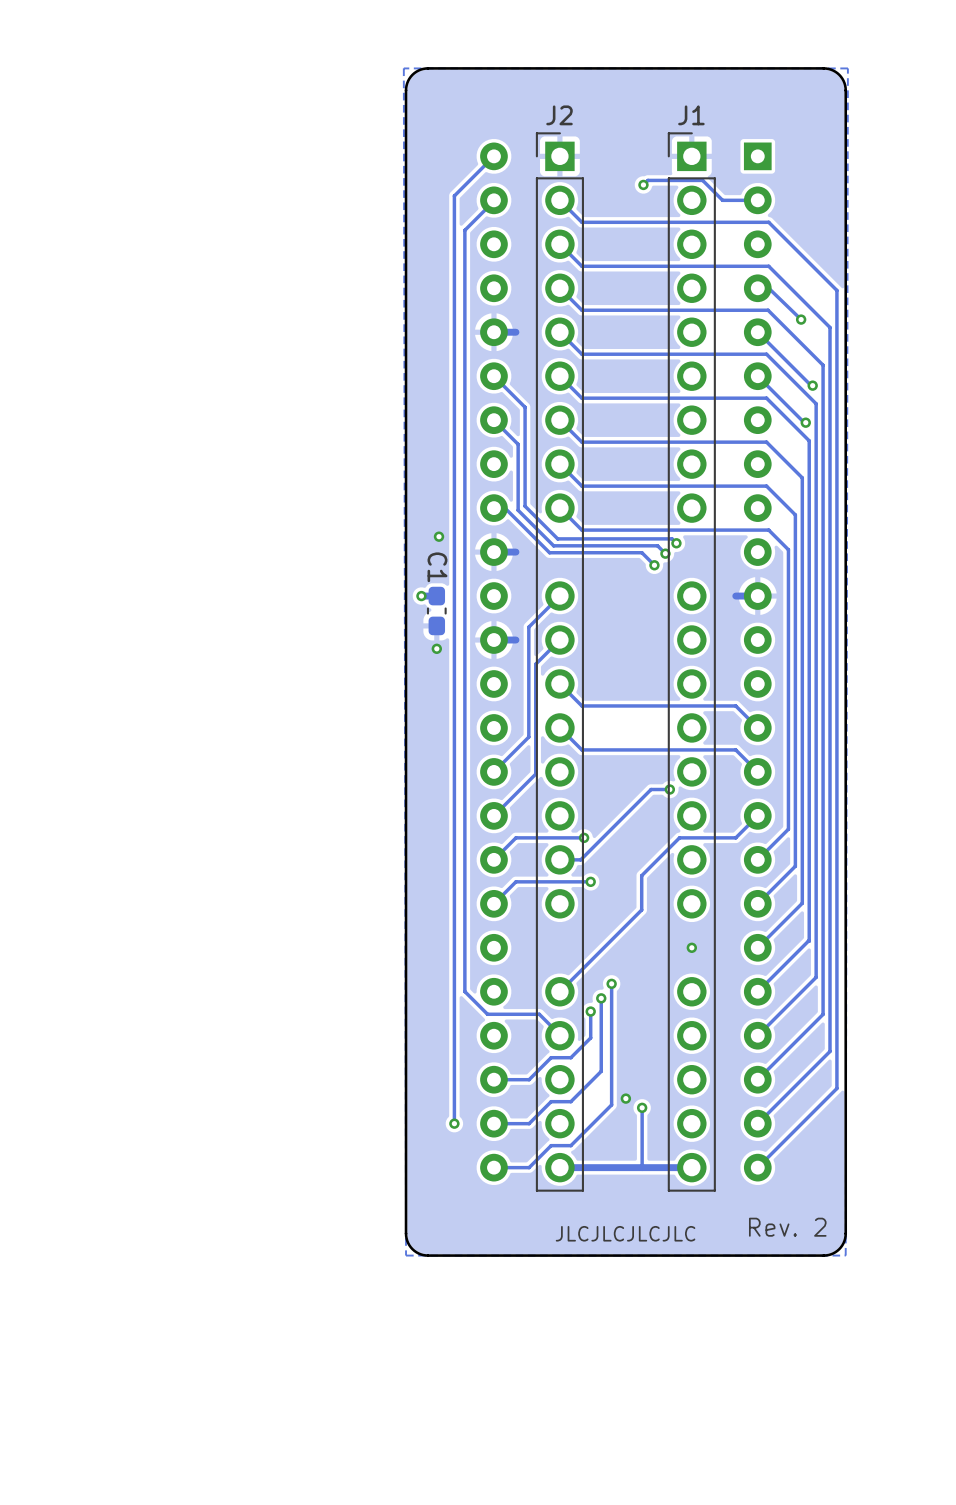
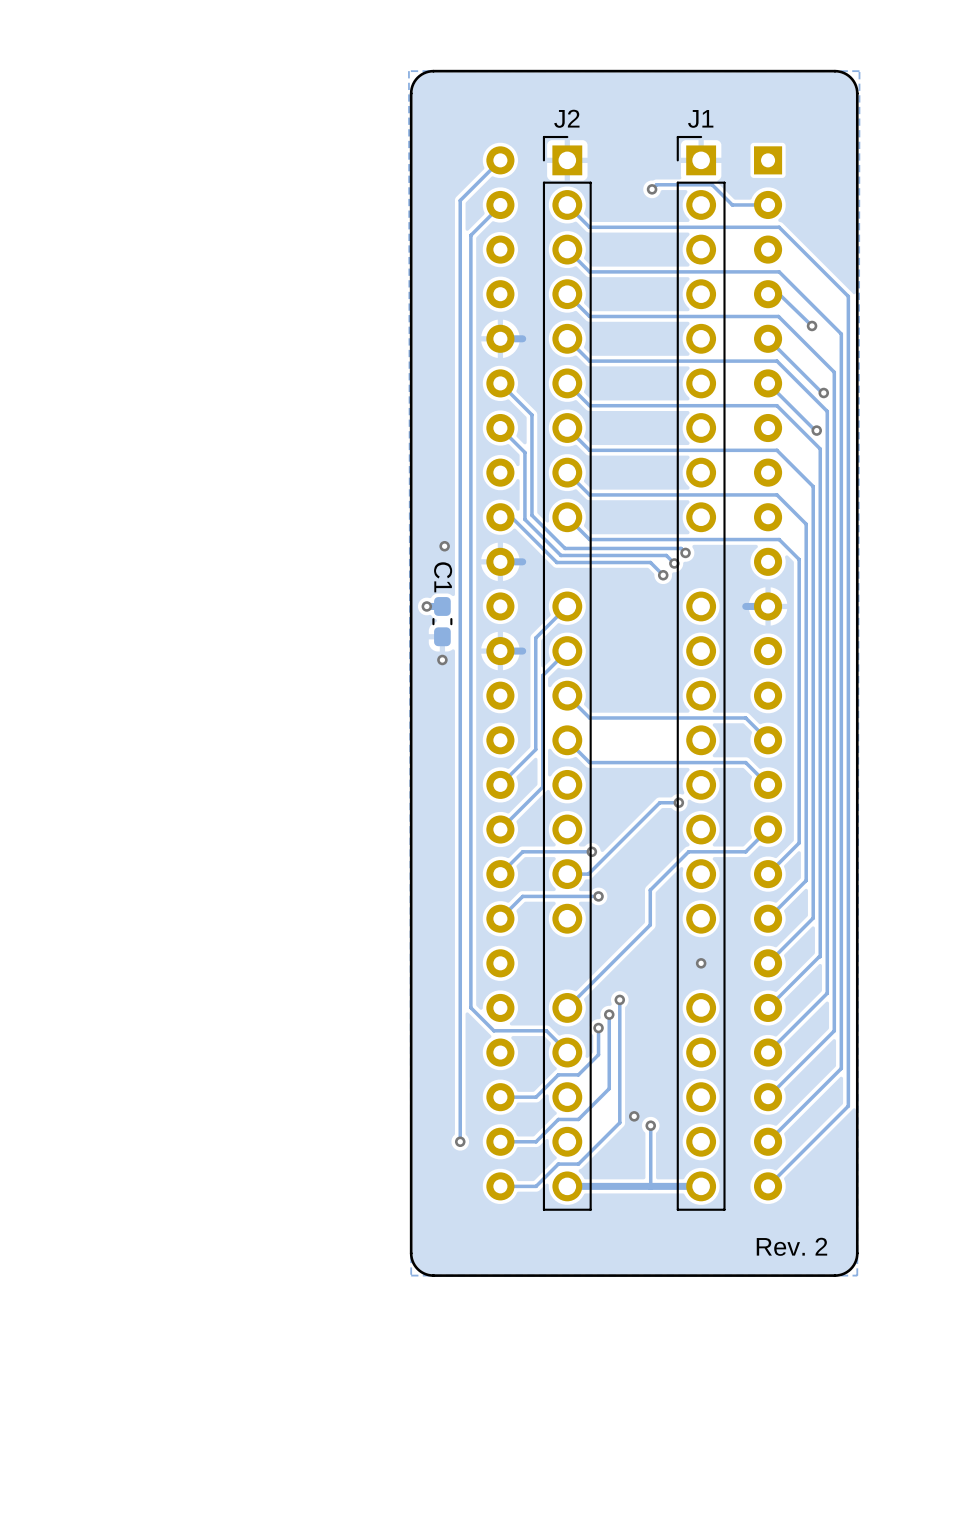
text: JLCJLCJLCJLC (625, 1233) -> none

